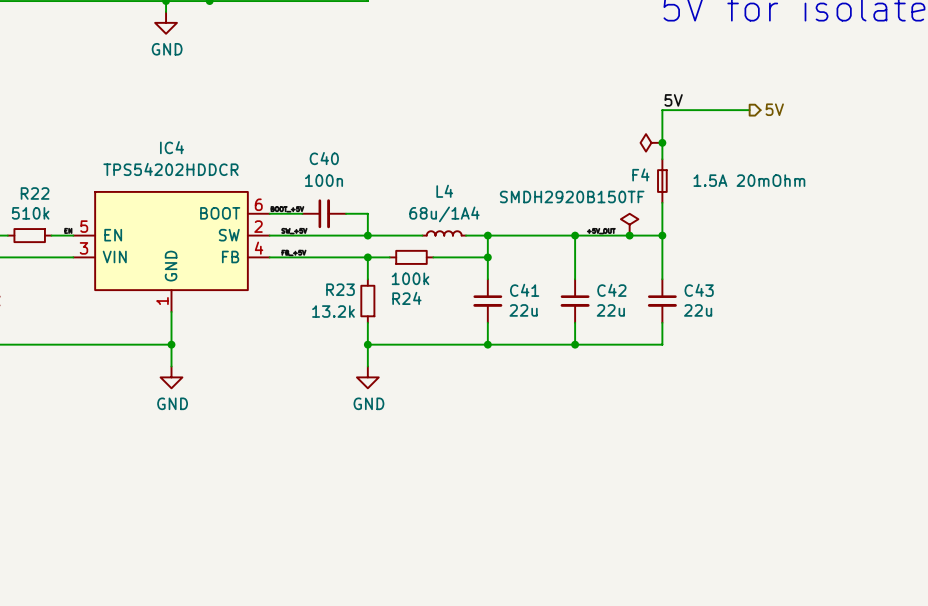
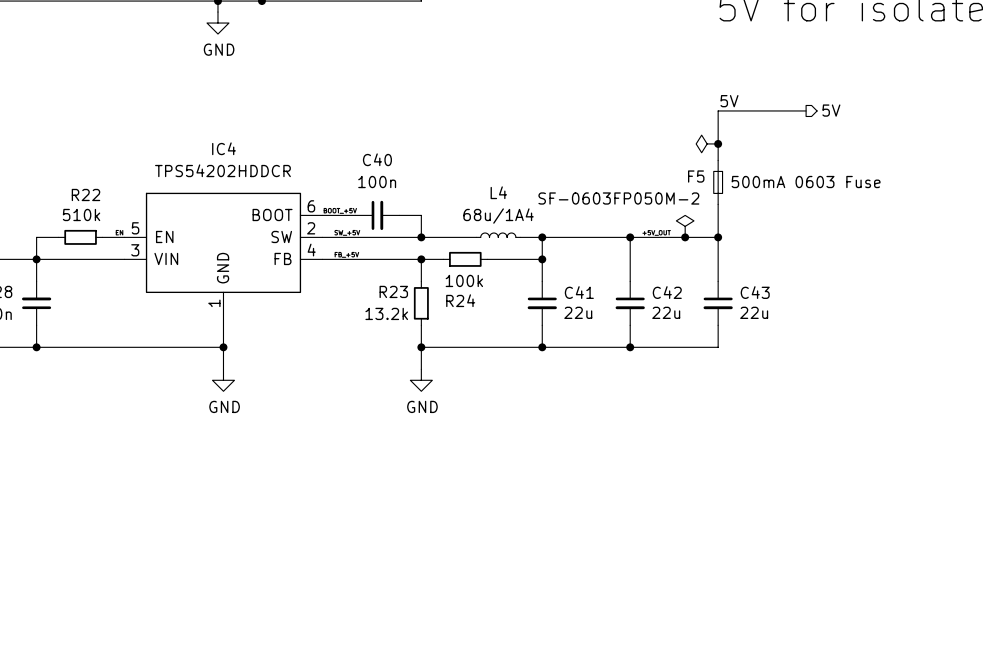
F4 name: F4 (640, 174) -> F5 (696, 176)
F4 text: 1.5A 20mOhm (749, 180) -> 500mA 0603 Fuse (806, 182)
F4 value: SMDH2920B150TF (572, 196) -> SF-0603FP050M-2 (618, 198)

